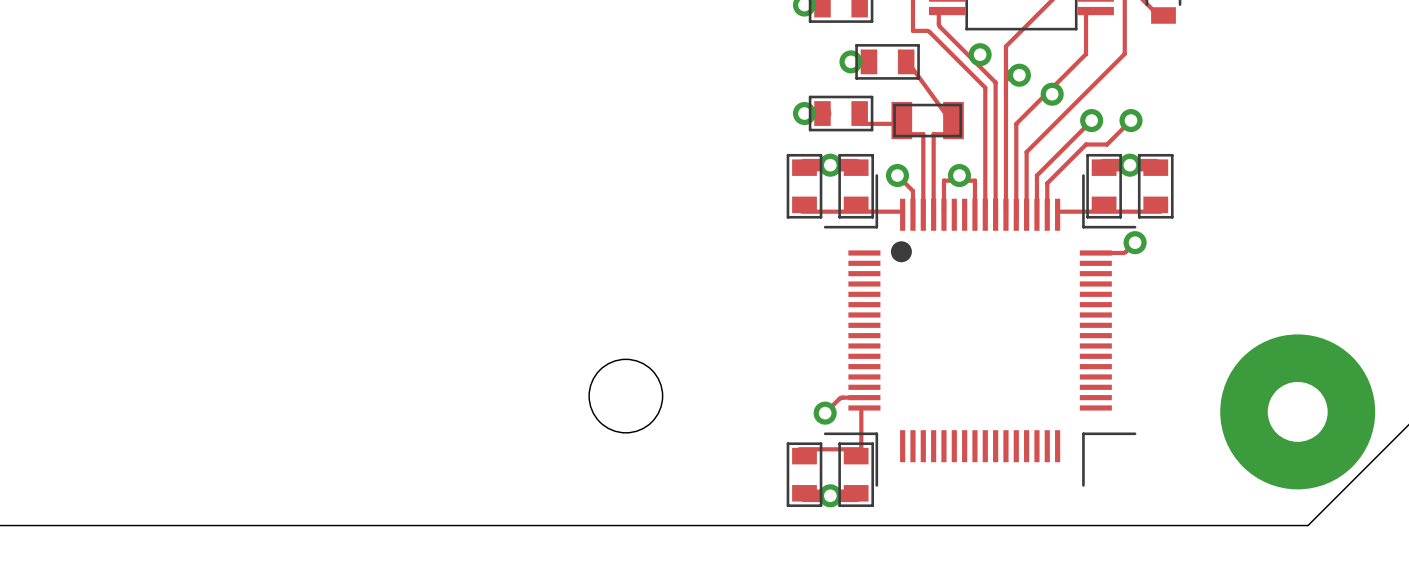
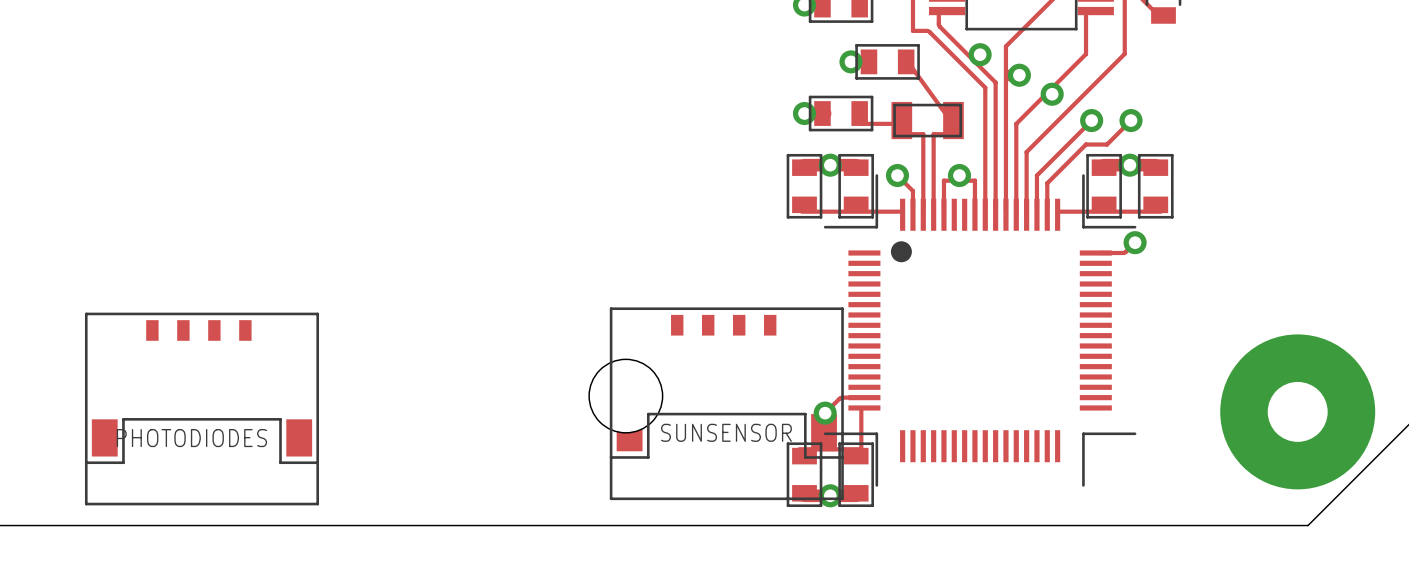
SUNSENSOR: none -> (726, 403)
PHOTODIODES: none -> (201, 409)

